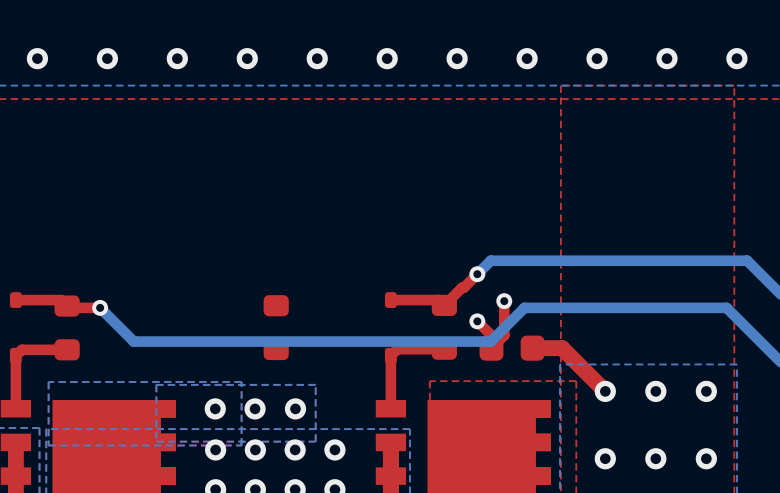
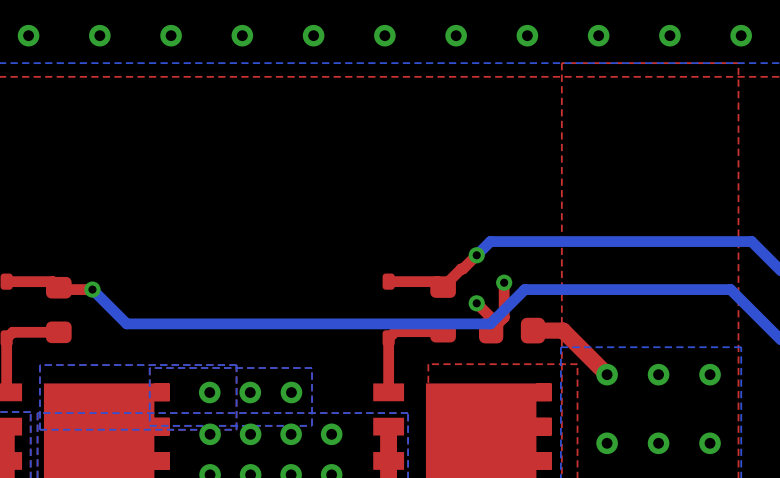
part: (276, 327) -> none

